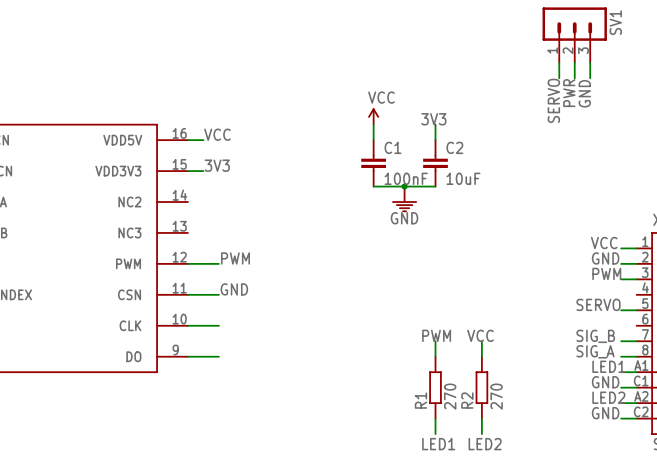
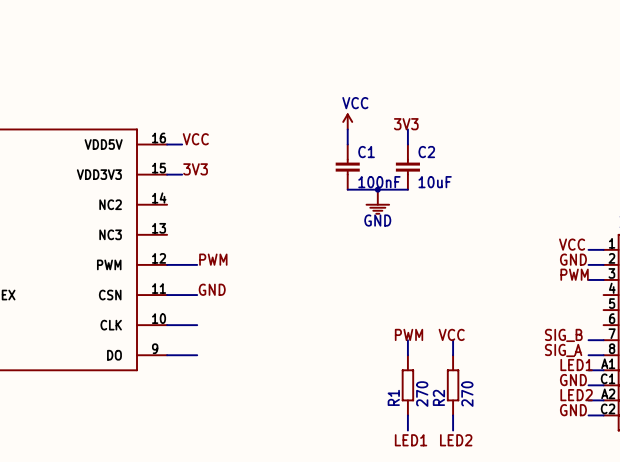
SV1: (574, 35) -> none
wire: (559, 62) (559, 78) -> none
wire: (574, 62) (574, 78) -> none
wire: (590, 62) (590, 78) -> none
label: PWR (569, 93) -> none
label: GND (584, 93) -> none
label: SERVO (553, 100) -> none
label: SERVO (598, 304) -> none
wire: (621, 310) (636, 310) -> none

